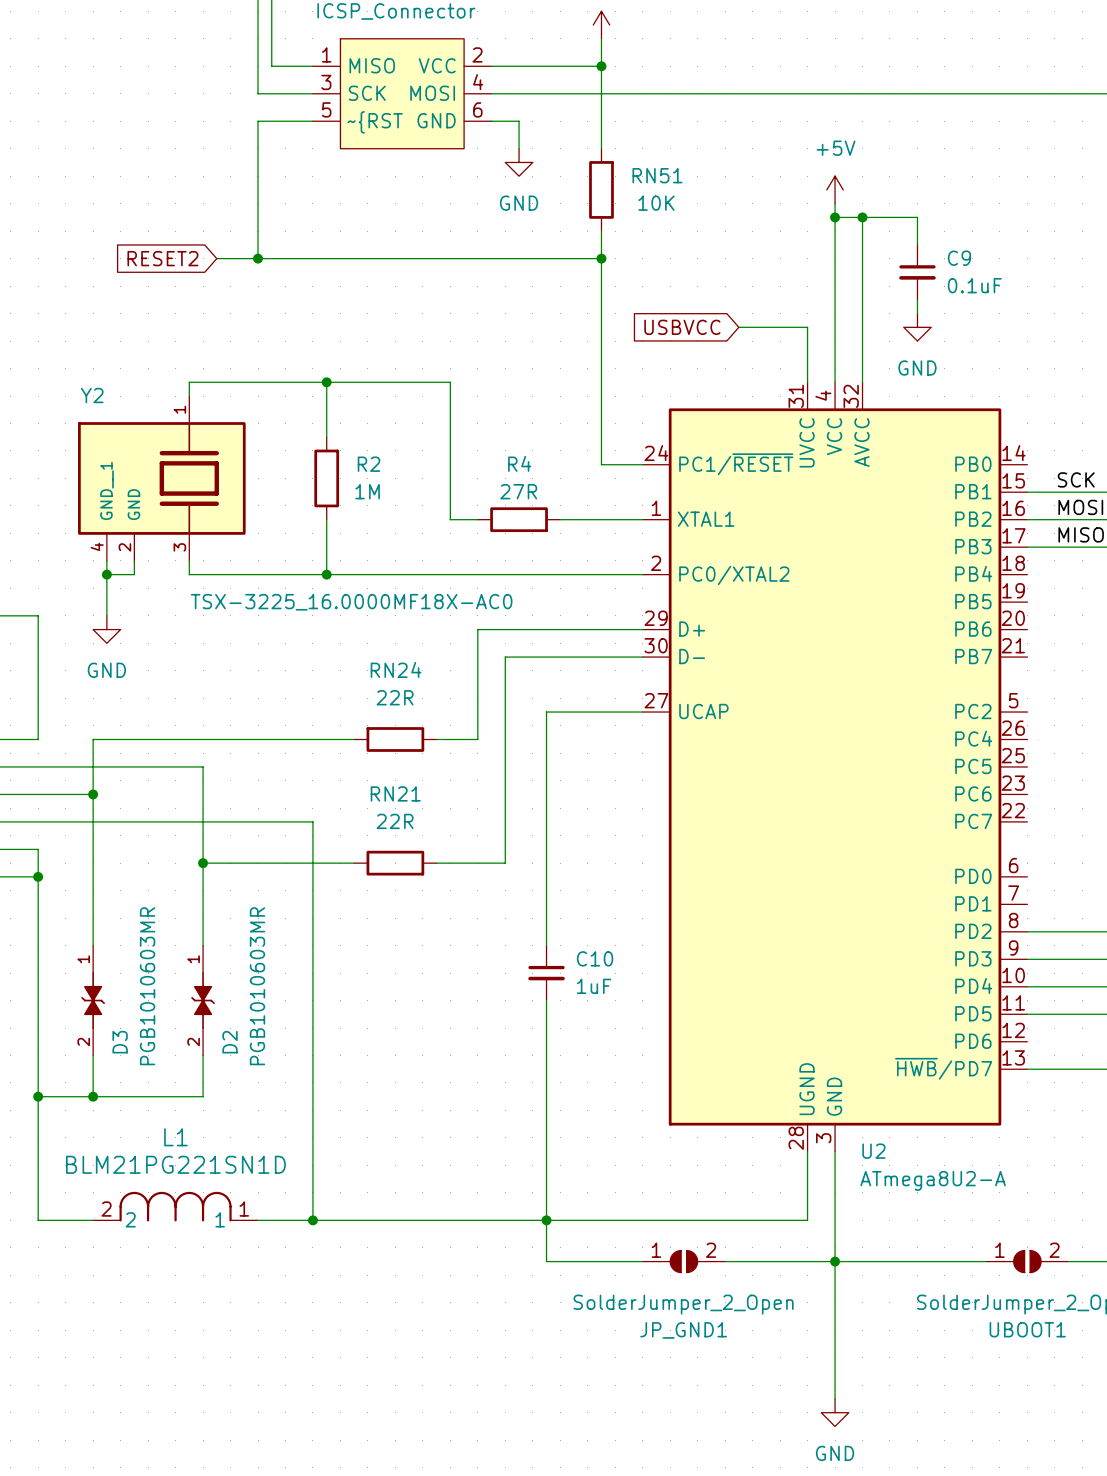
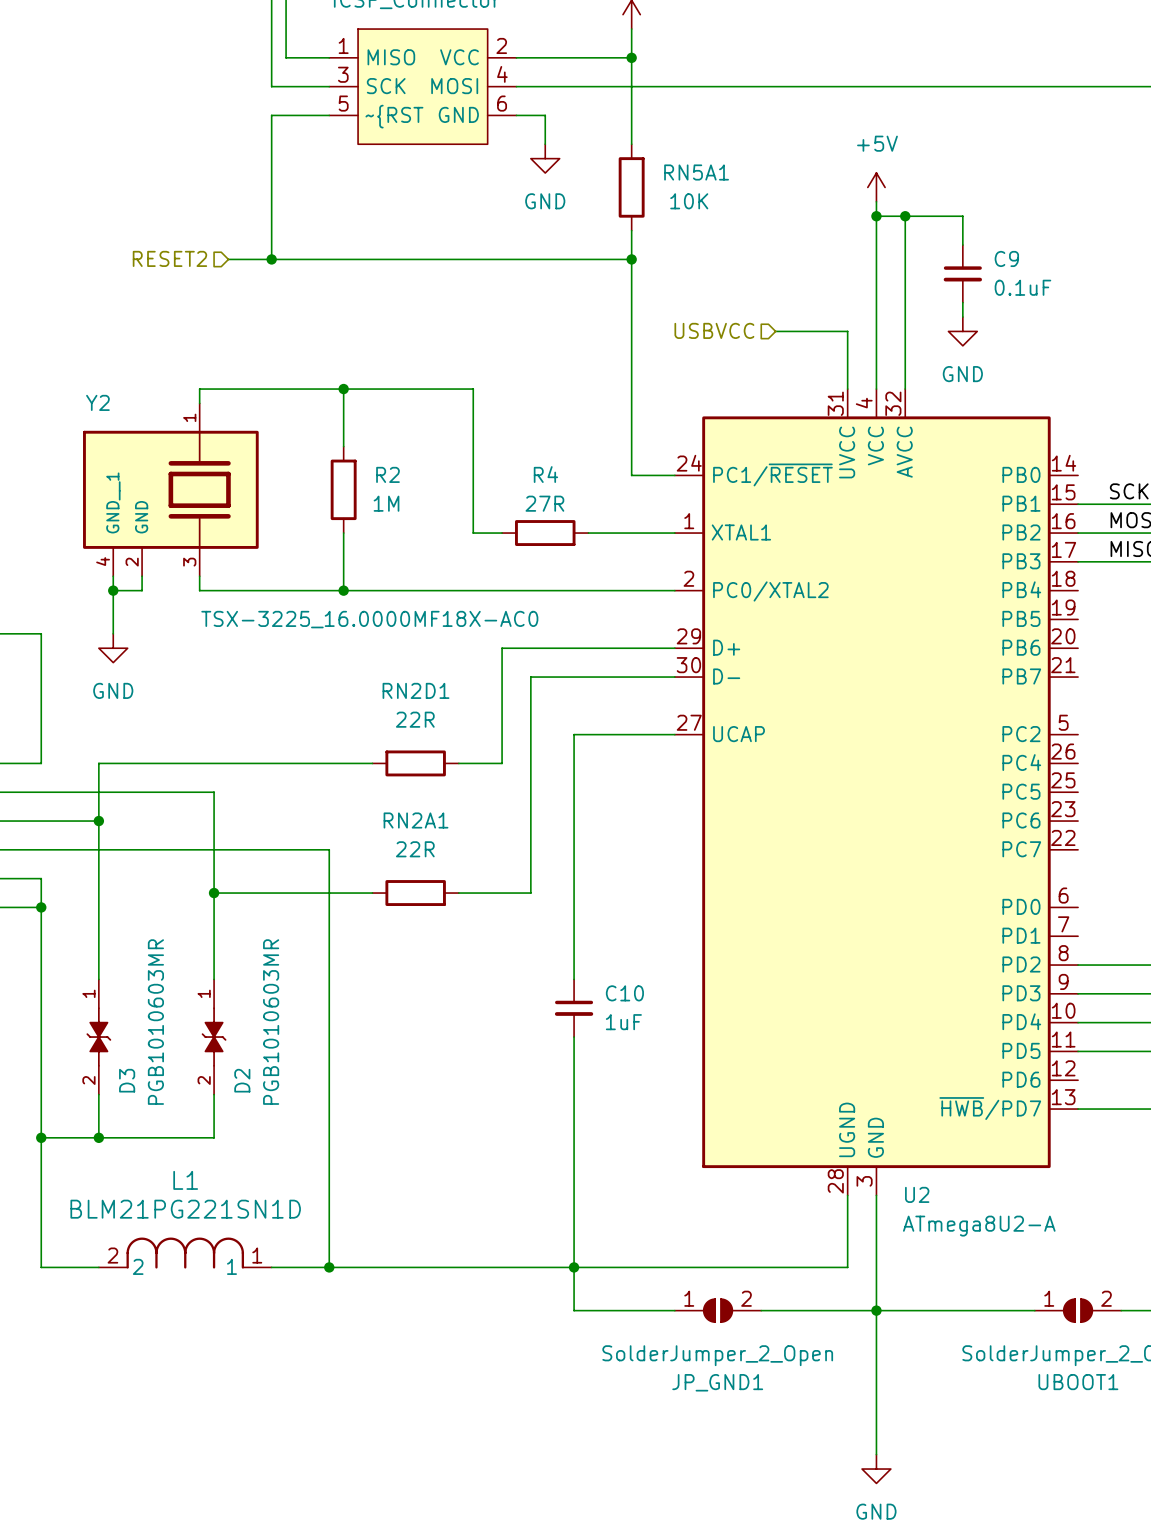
RN51 name: RN51 (657, 175) -> RN5A1 (696, 172)
hierarchical label: none -> RESET2 (169, 258)
global label: RESET2 (162, 258) -> none
hierarchical label: none -> USBVCC (714, 330)
global label: USBVCC (682, 327) -> none
RN24 name: RN24 (396, 669) -> RN2D1 (416, 690)
RN21 name: RN21 (395, 793) -> RN2A1 (416, 820)

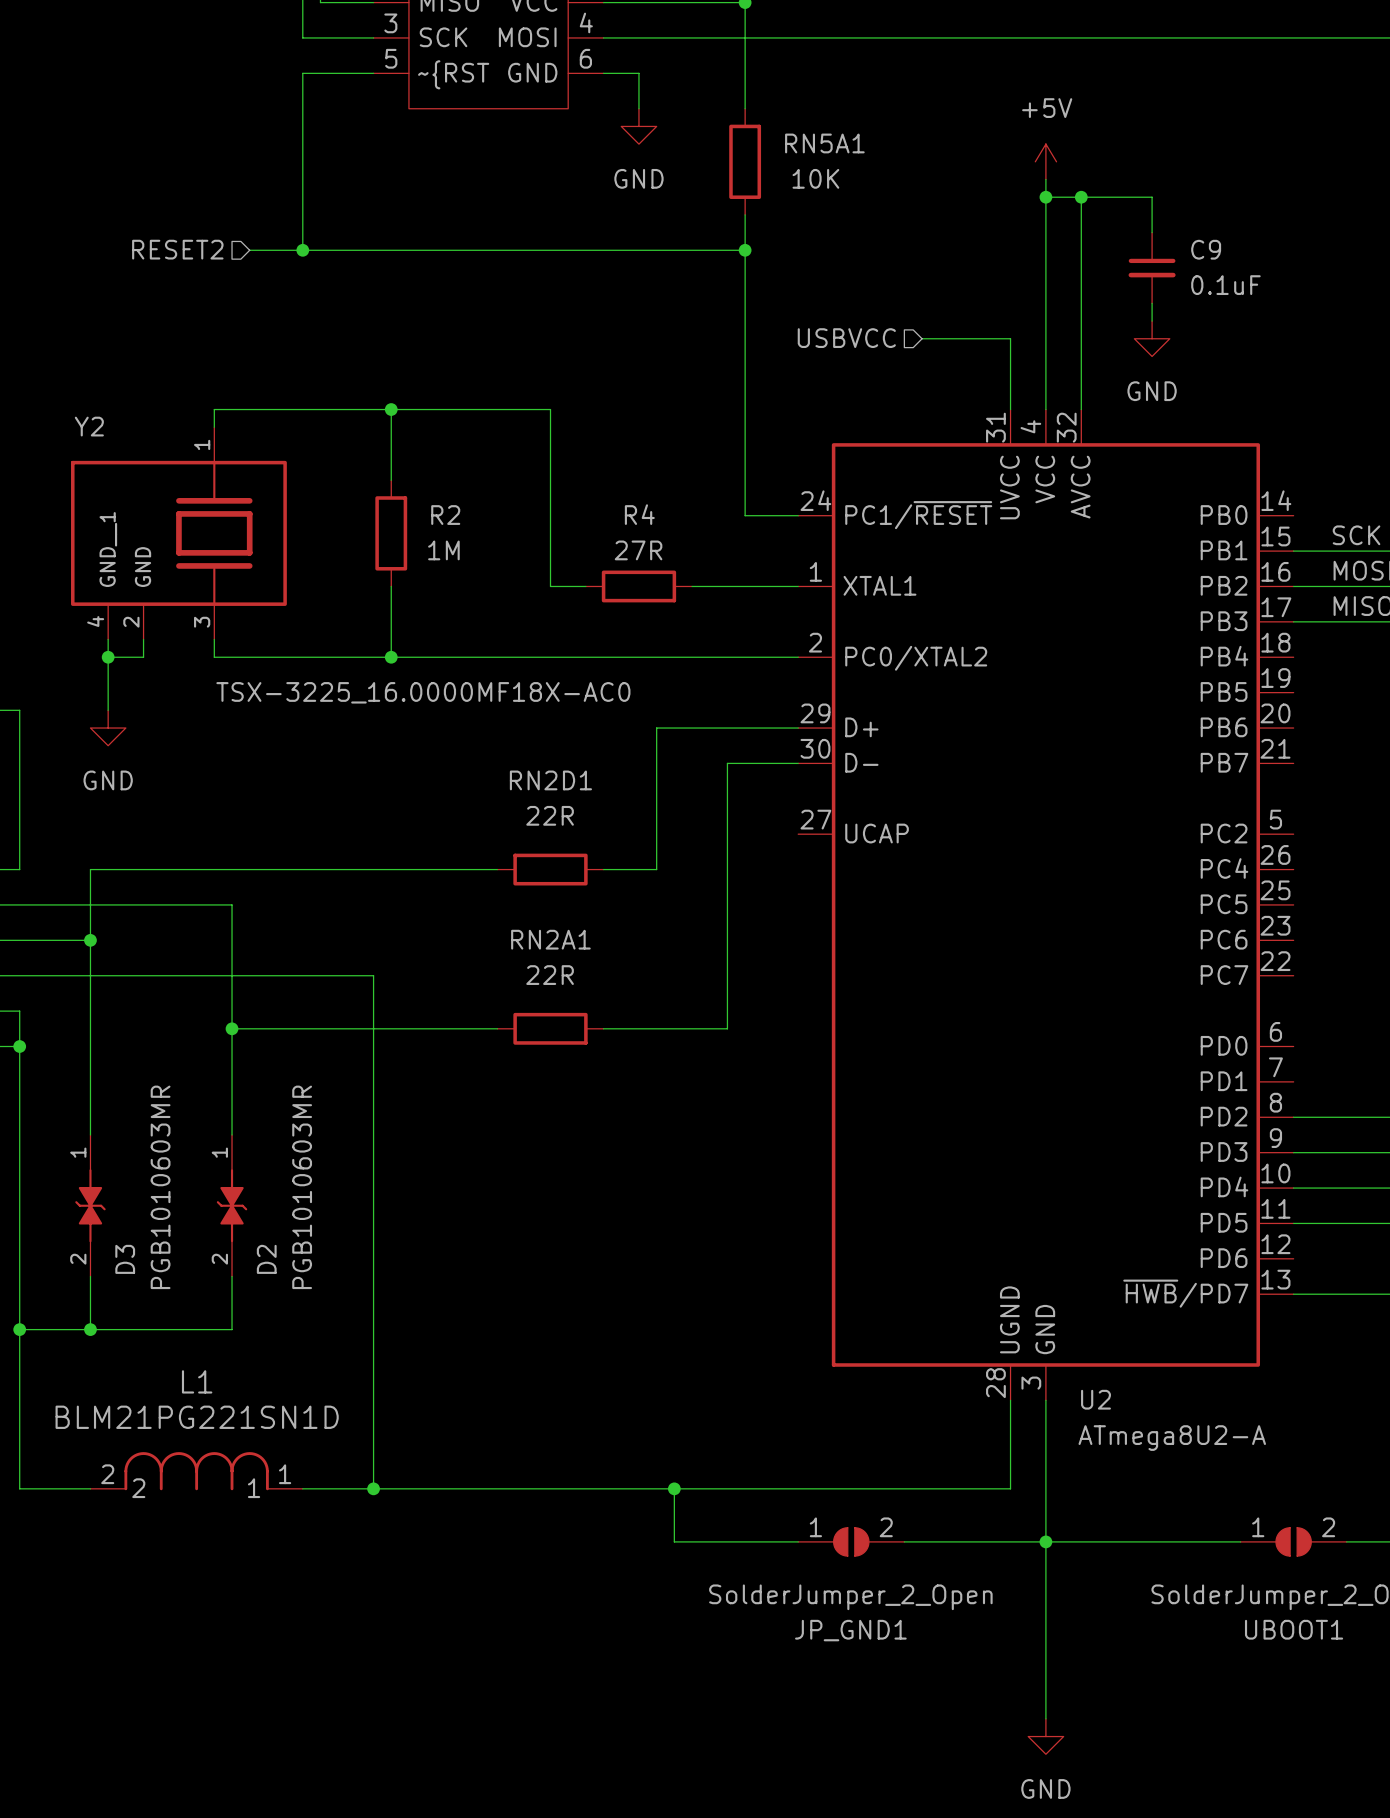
wire: (559, 648) (502, 648) (502, 763) (458, 763) -> (656, 728) (656, 869) (603, 869)
wire: (617, 677) (530, 677) (530, 893) -> (727, 763) (727, 1028) (621, 1028)
wire: (674, 734) (574, 734) (574, 979) -> none
wire: none -> (426, 869) (497, 869)
RN2D1 position: (415, 763) -> (550, 869)
RN2A1 position: (415, 893) -> (550, 1028)
wire: (458, 893) (516, 893) -> (426, 1028) (497, 1028)
C10: (574, 1008) -> none
wire: (574, 1037) (574, 1267) -> none

